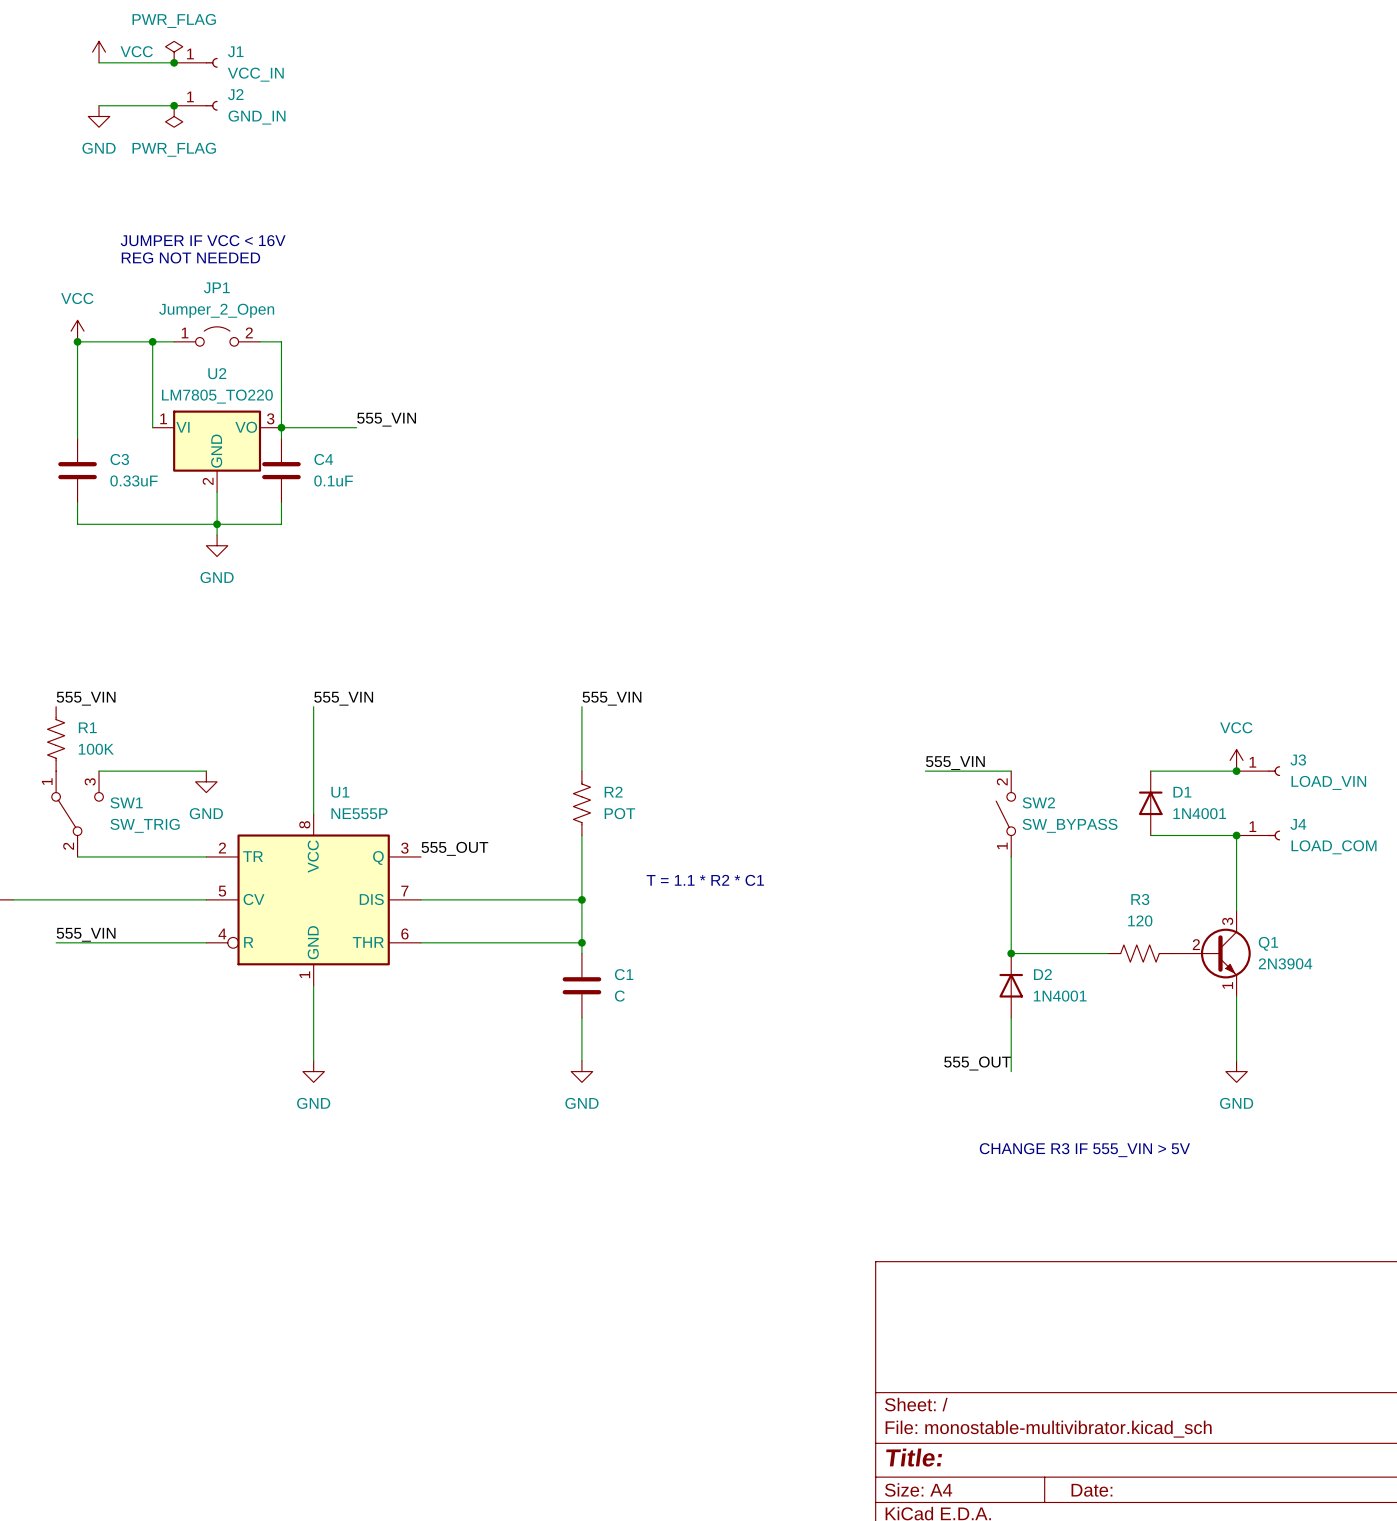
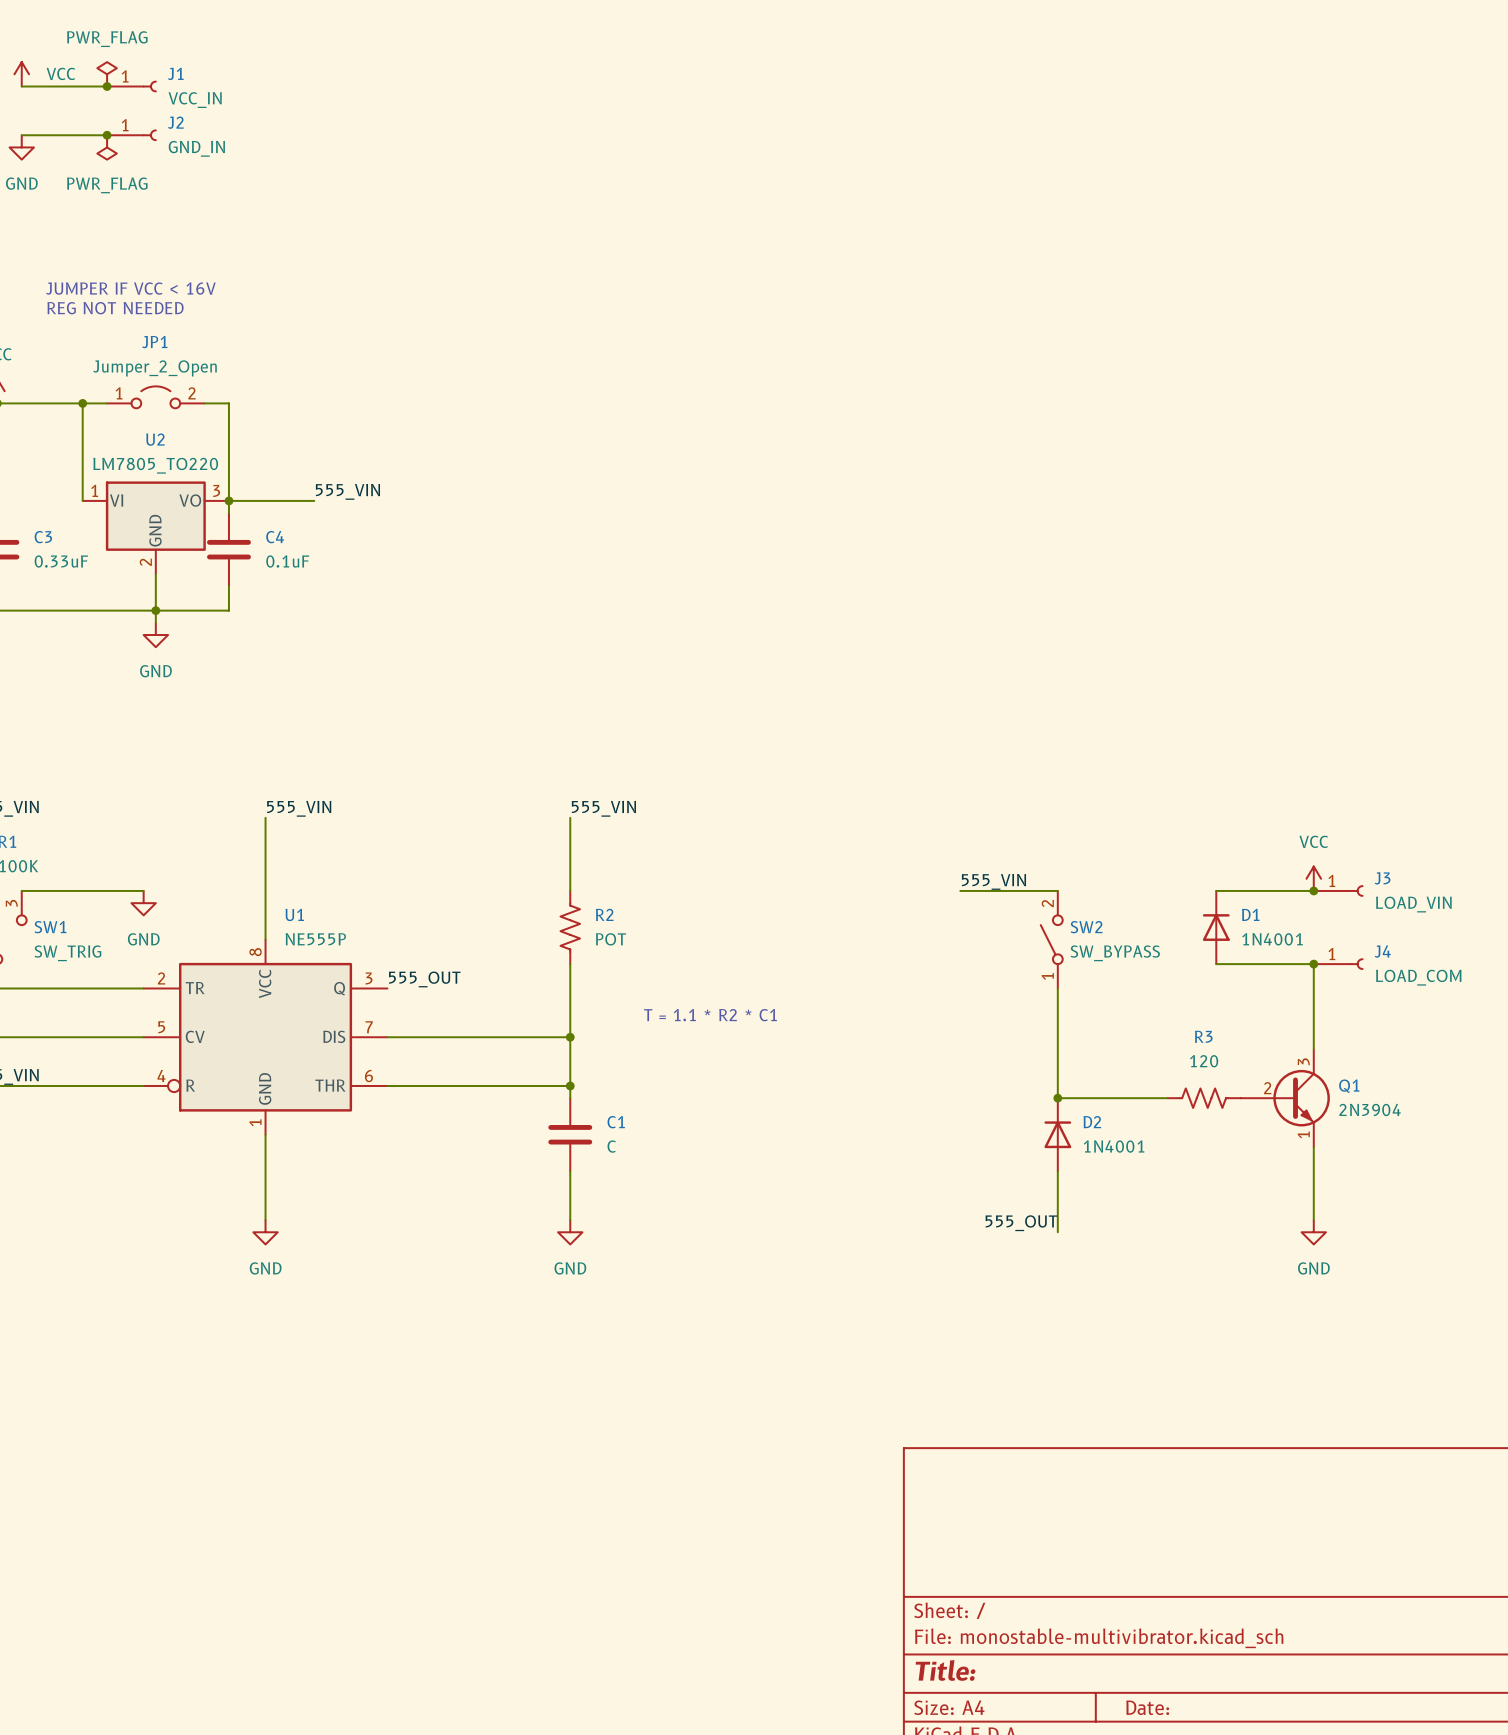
text: CHANGE R3 IF 555_VIN > 5V (1084, 1150) -> none

